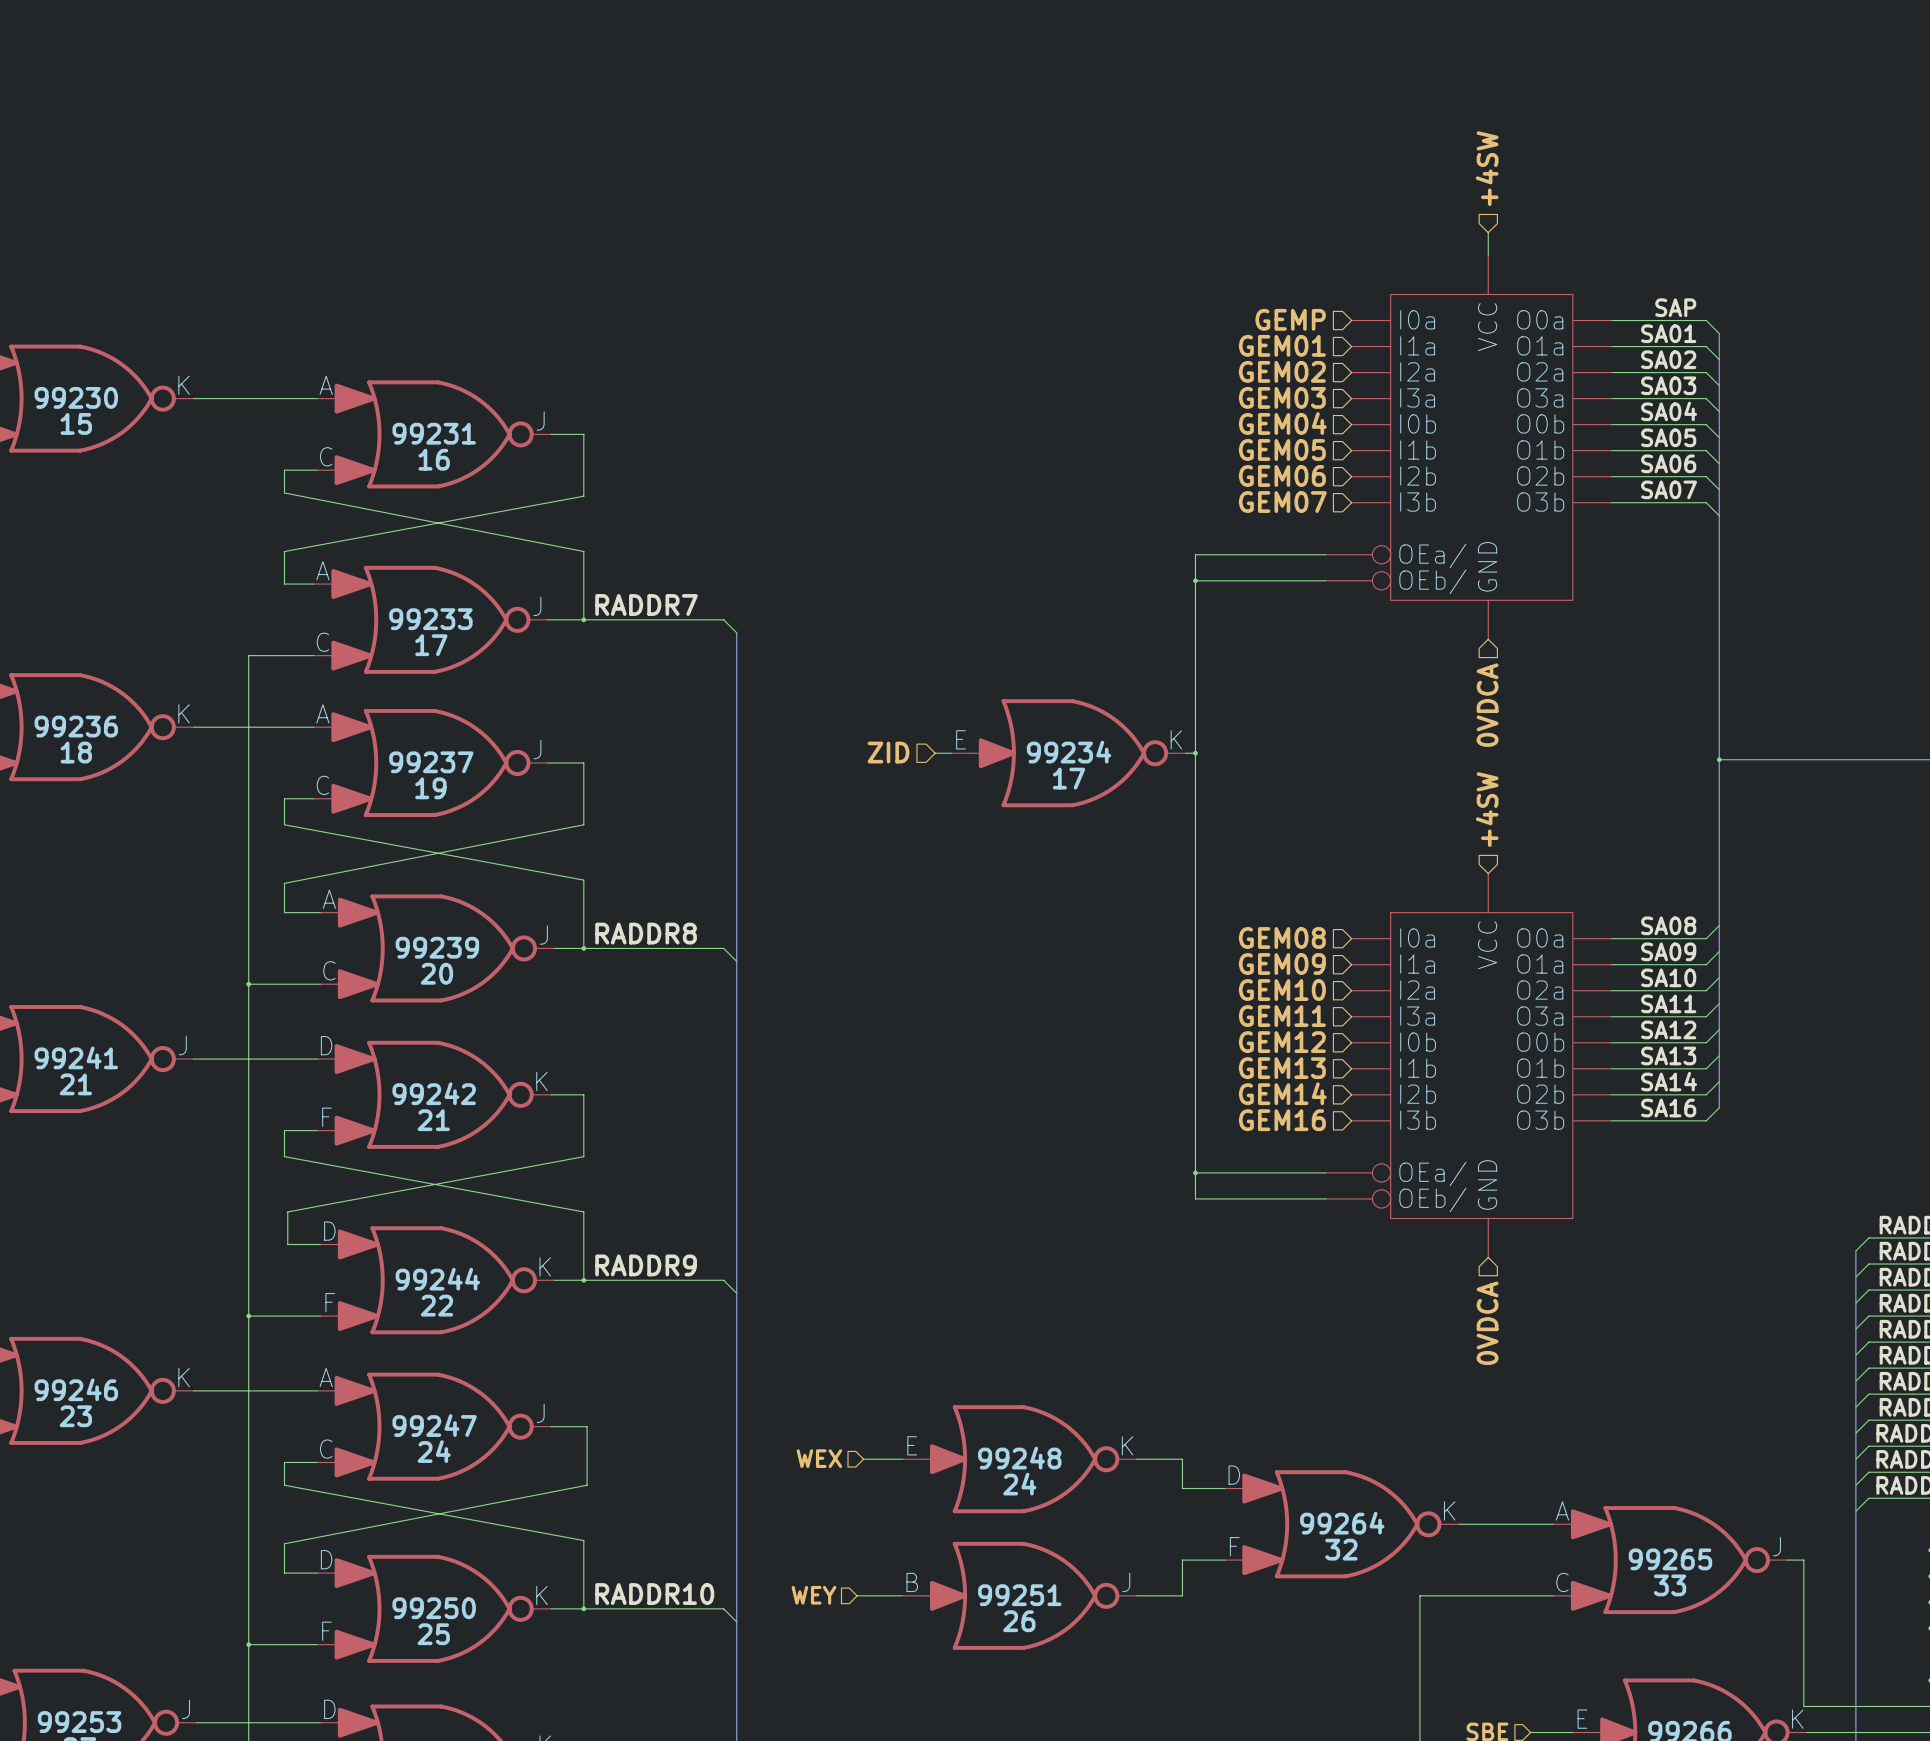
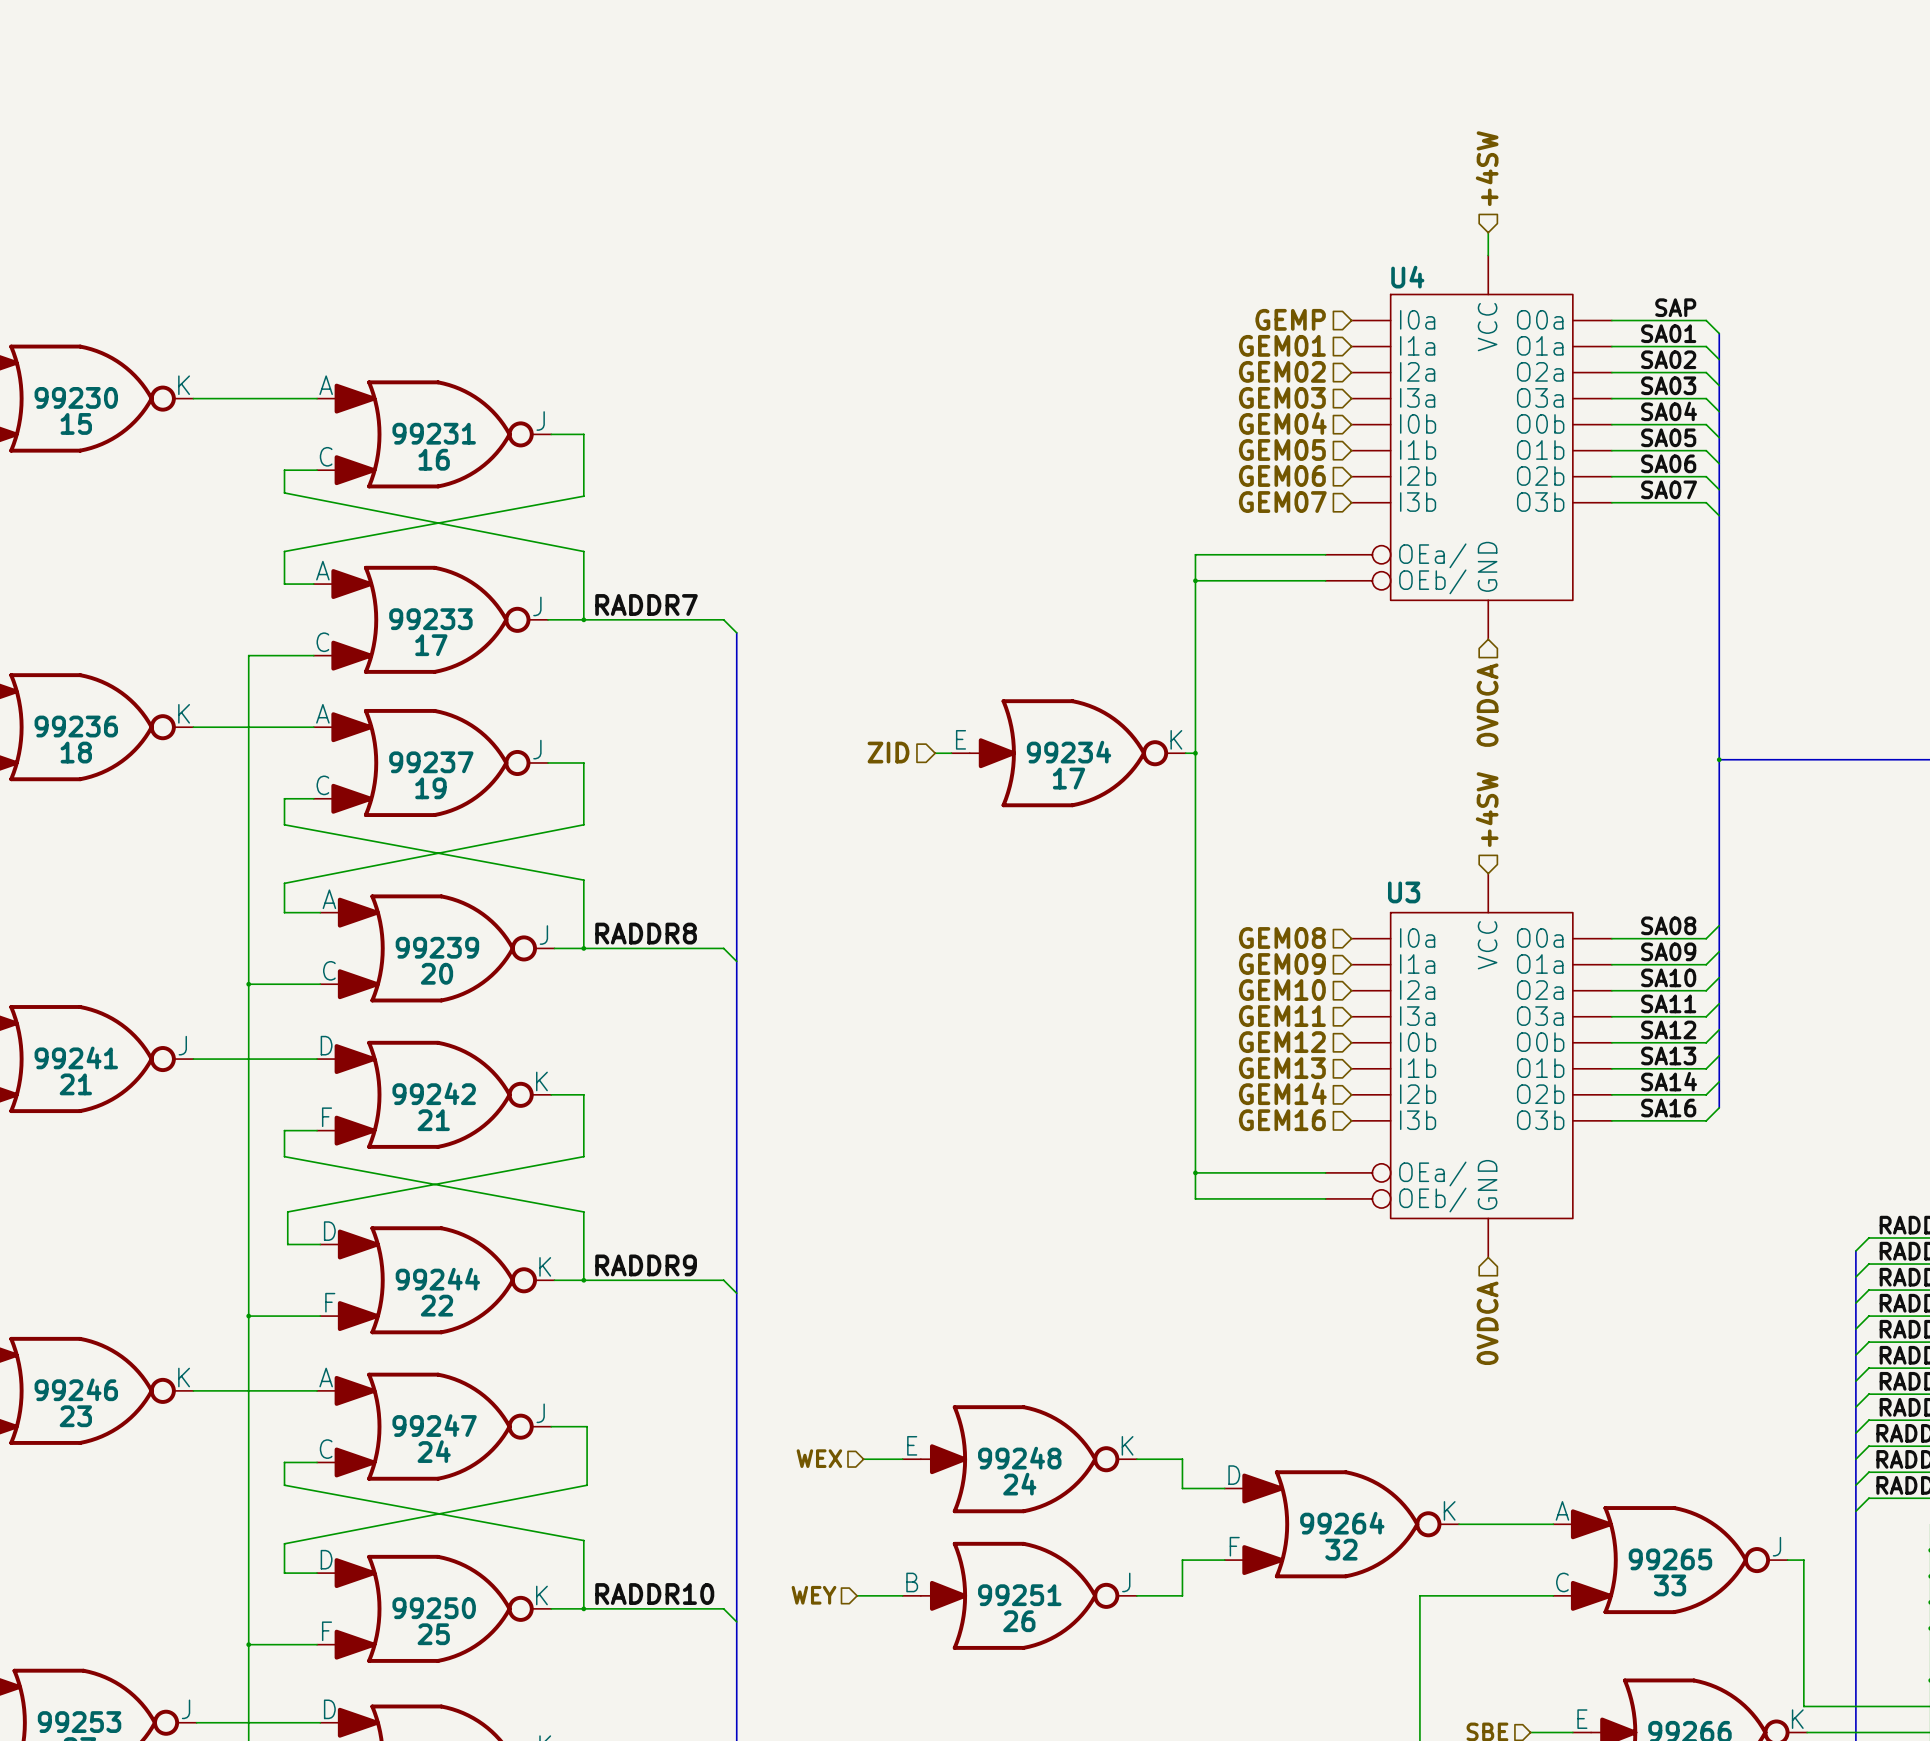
U4 name: none -> U4 (1407, 277)
U3 name: none -> U3 (1404, 892)

